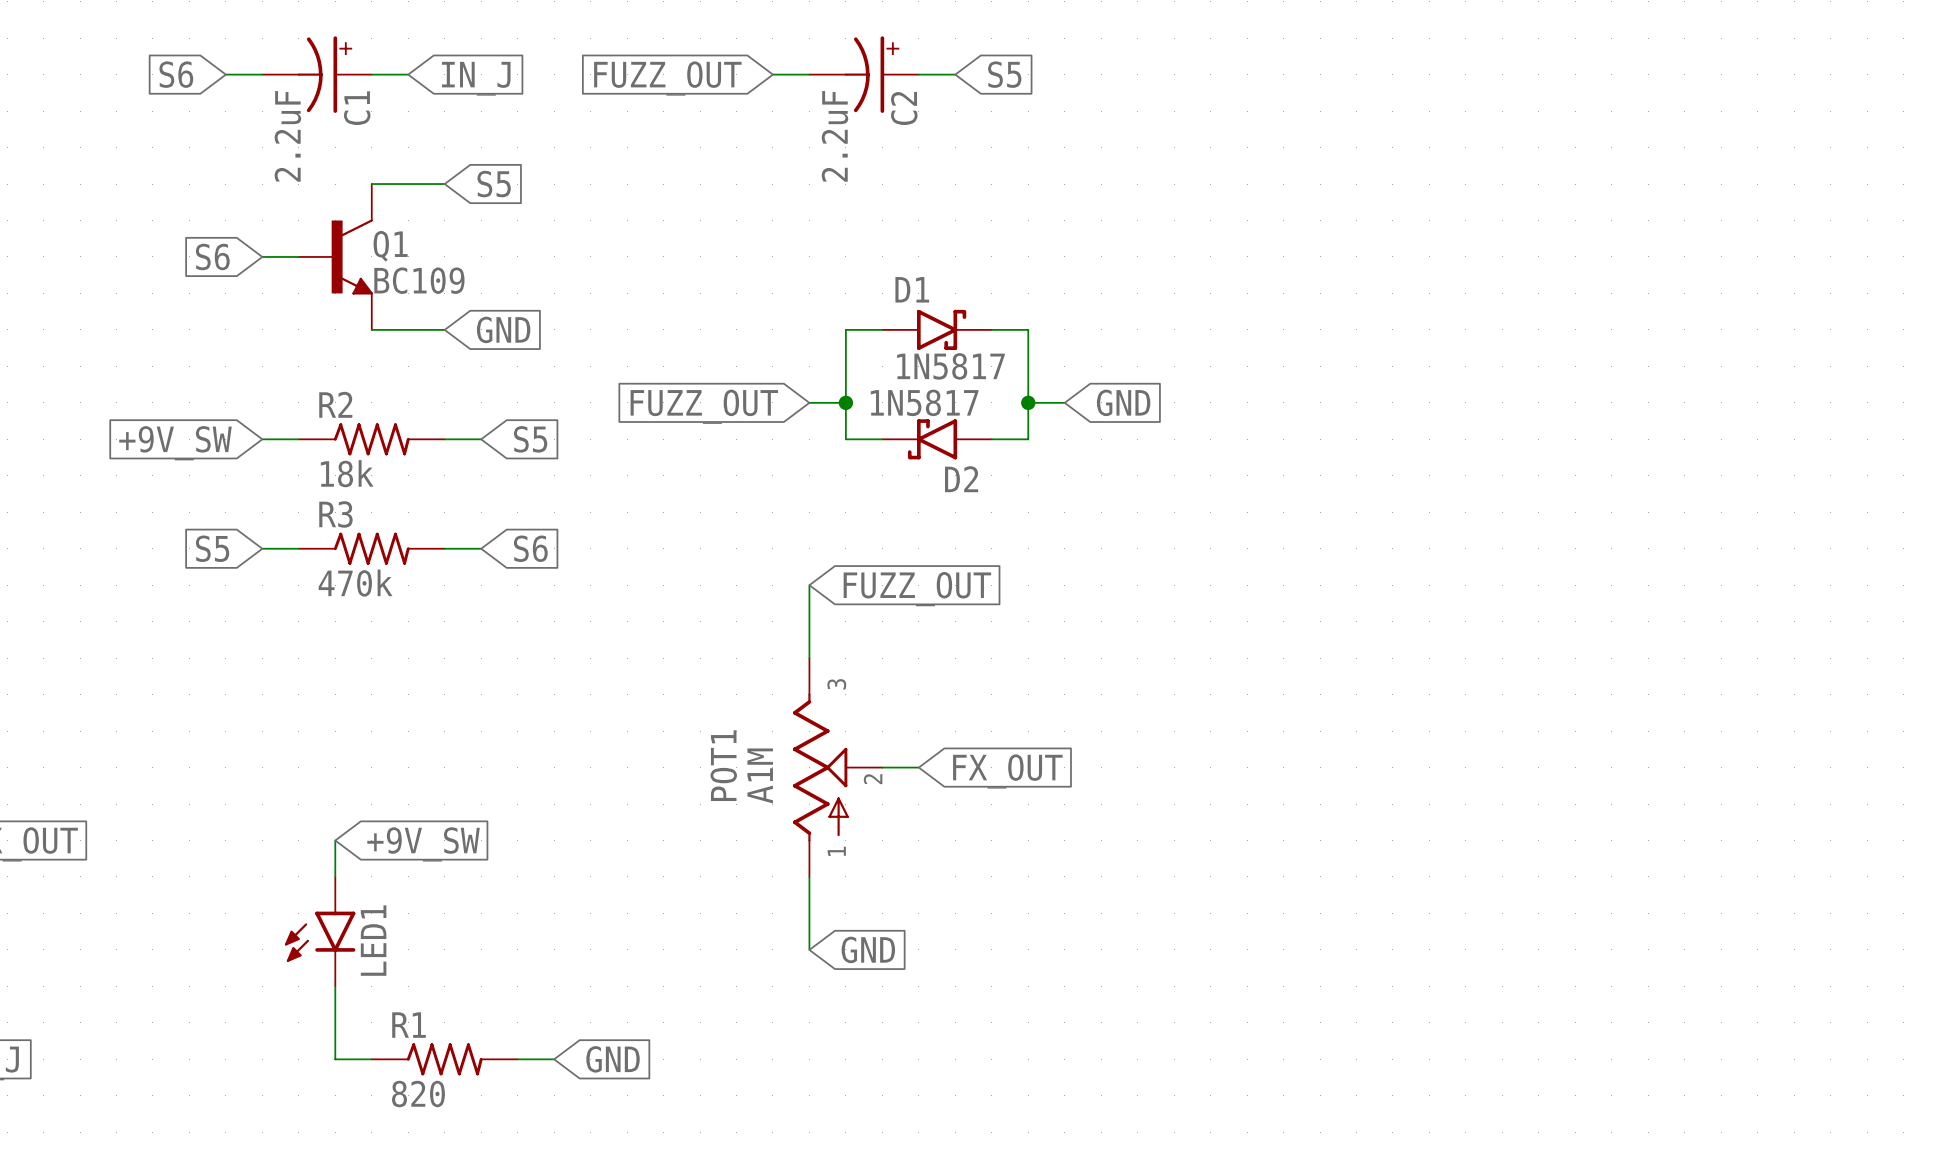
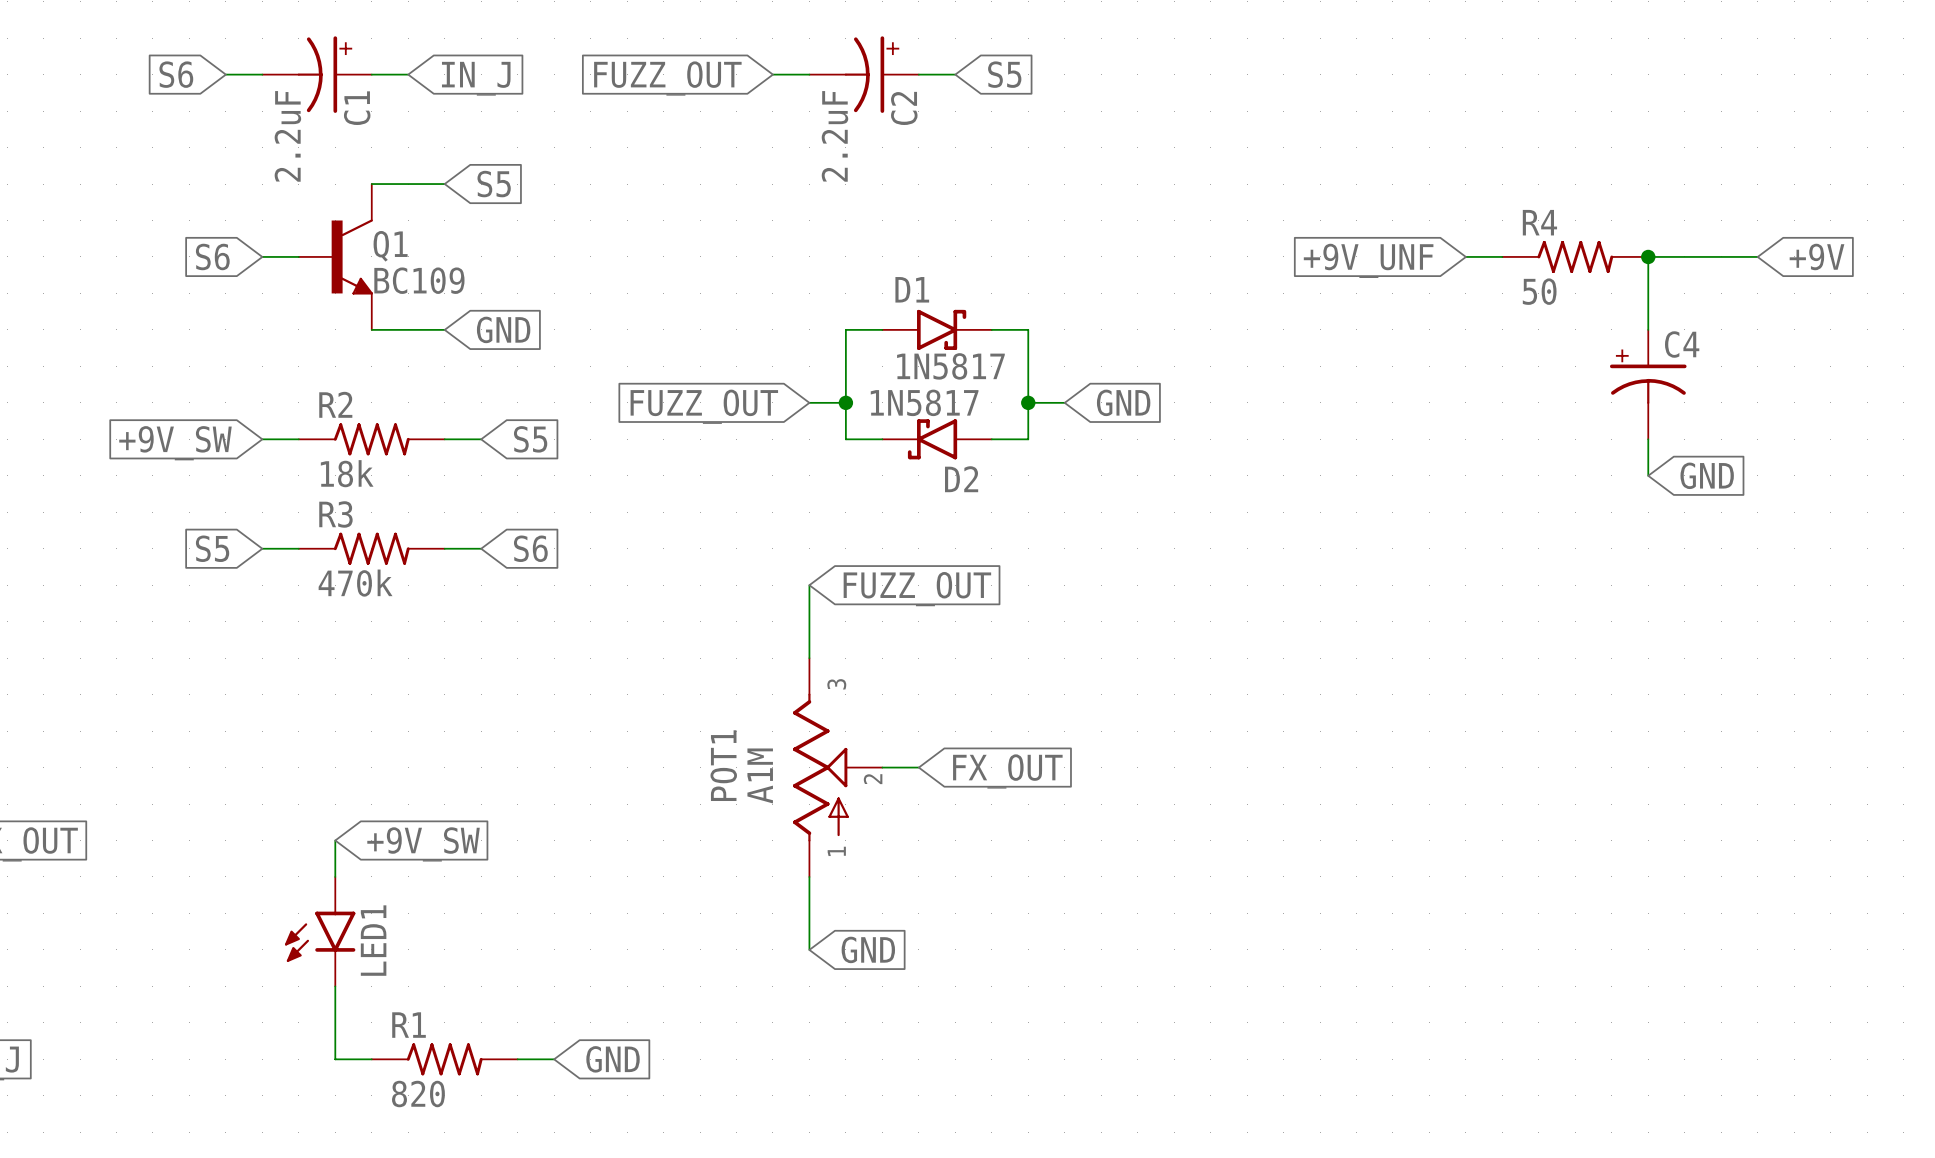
wire: none -> (1465, 256) (1502, 256)
R4: none -> 50 (1575, 256)
junction: none -> (1648, 256)
wire: none -> (1757, 256) (1648, 256) (1648, 329)
global label: none -> +9V (1817, 256)
global label: none -> +9V_UNF (1368, 260)
C4: none -> (1648, 384)
wire: none -> (1648, 439) (1648, 475)
global label: none -> GND (1707, 475)

